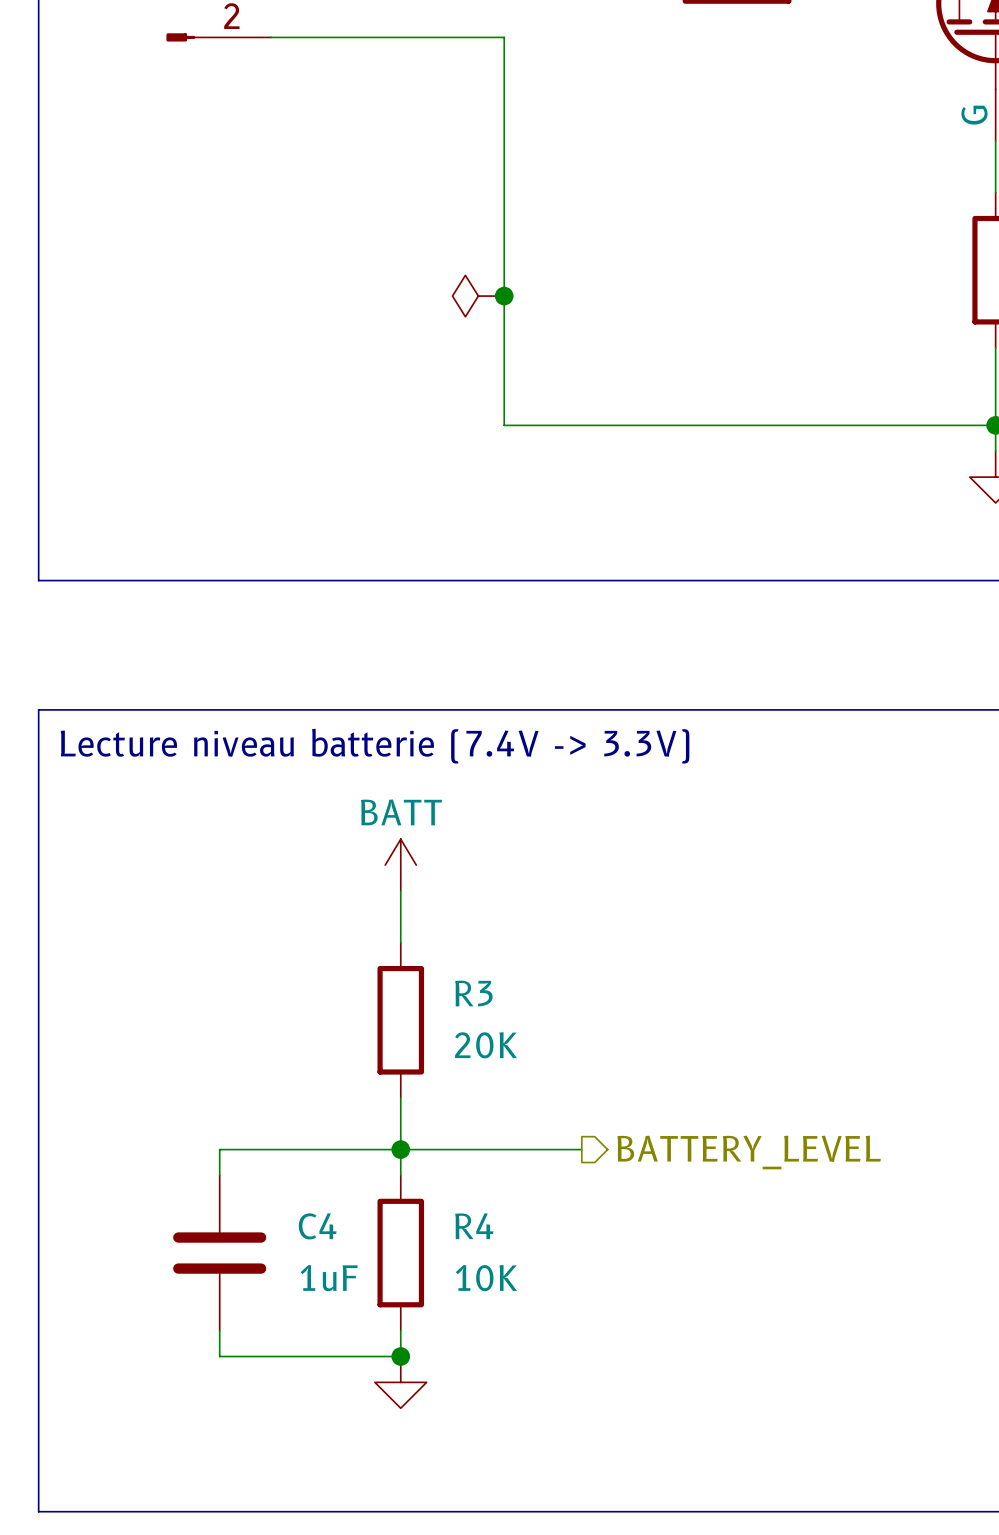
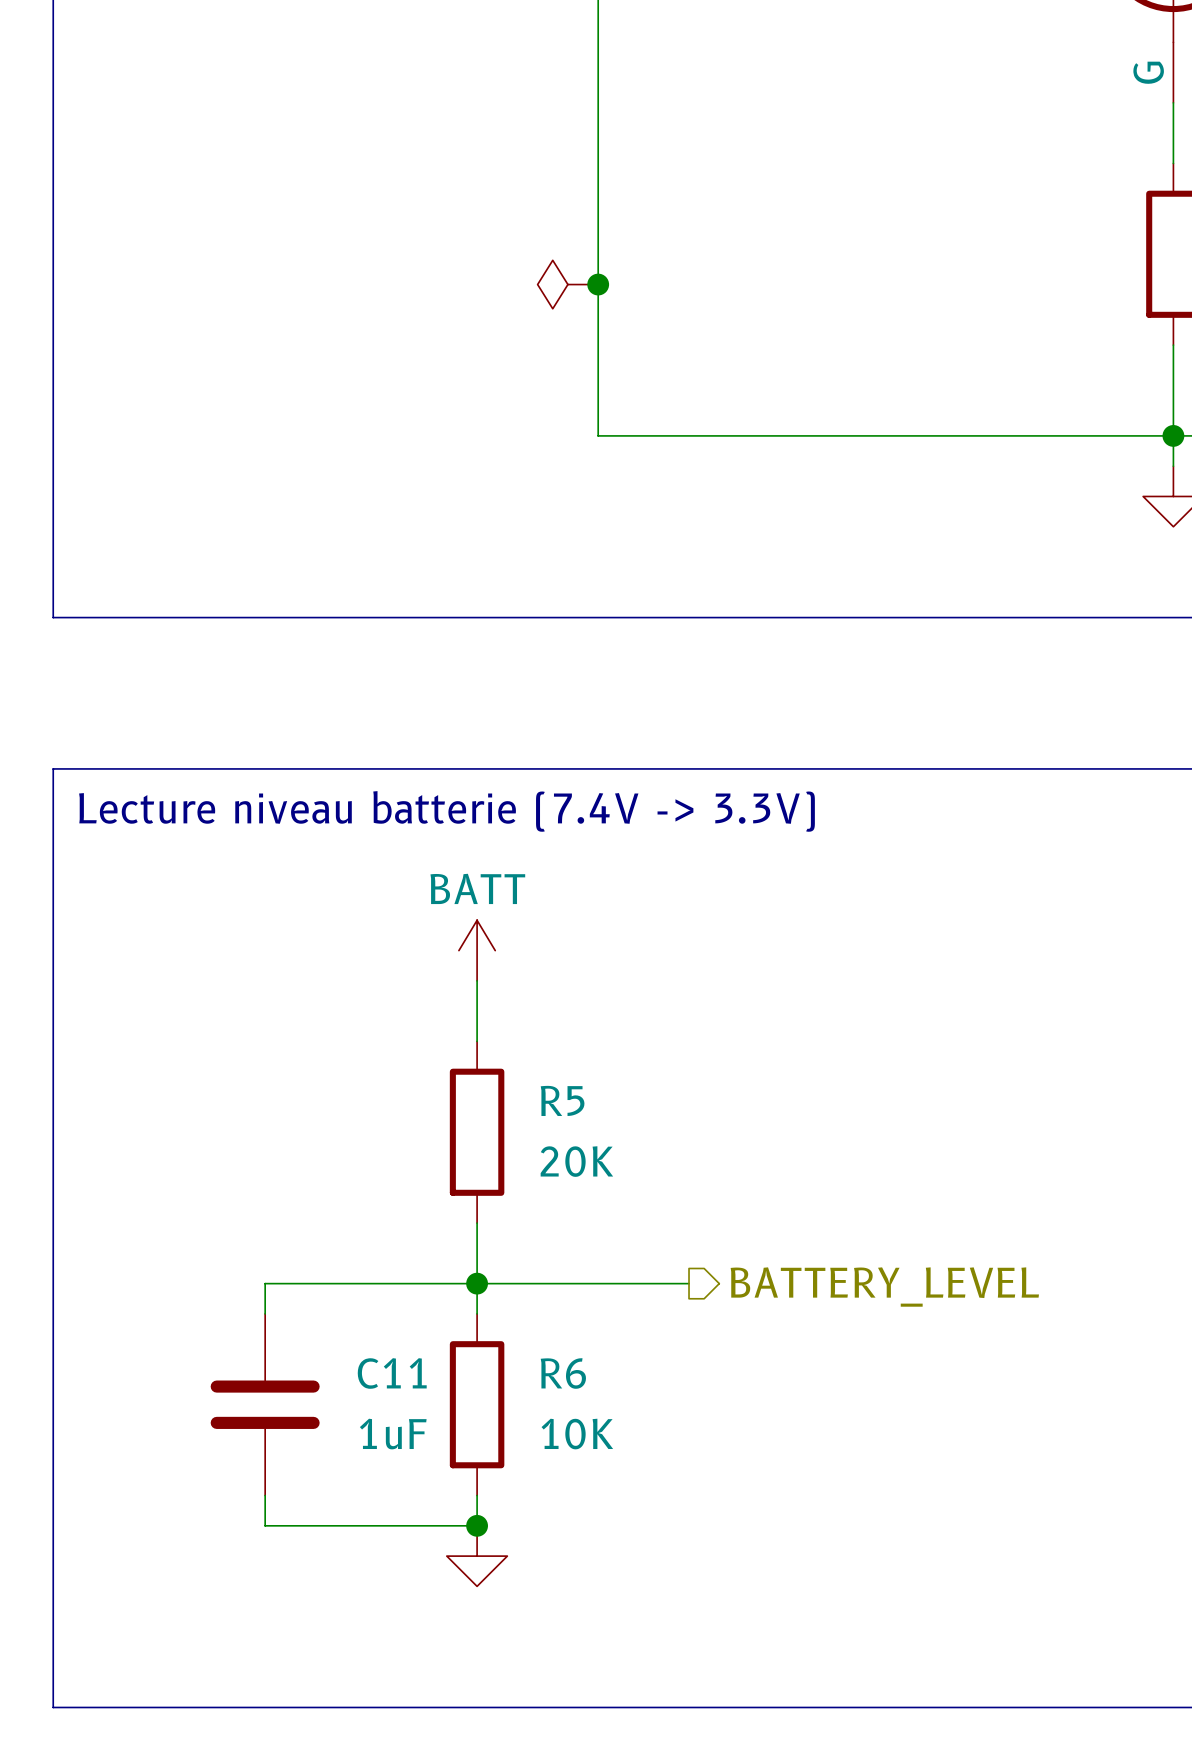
R3 name: R3 (473, 993) -> R5 (562, 1100)
C4 name: C4 (317, 1226) -> C11 (392, 1373)
R4 name: R4 (474, 1226) -> R6 (563, 1373)

